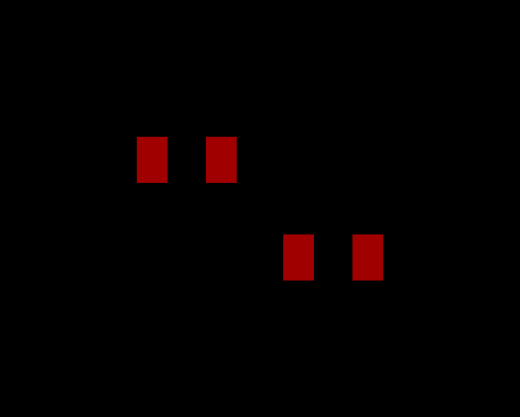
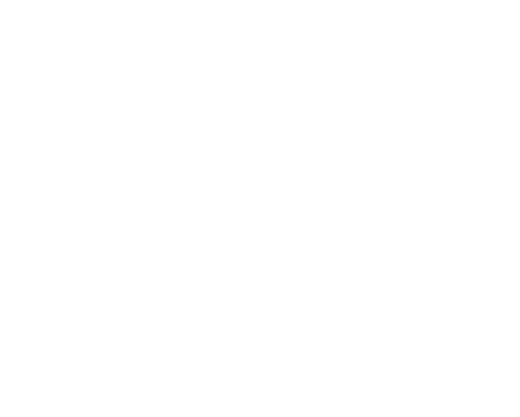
part: (186, 159) -> none
part: (333, 257) -> none

